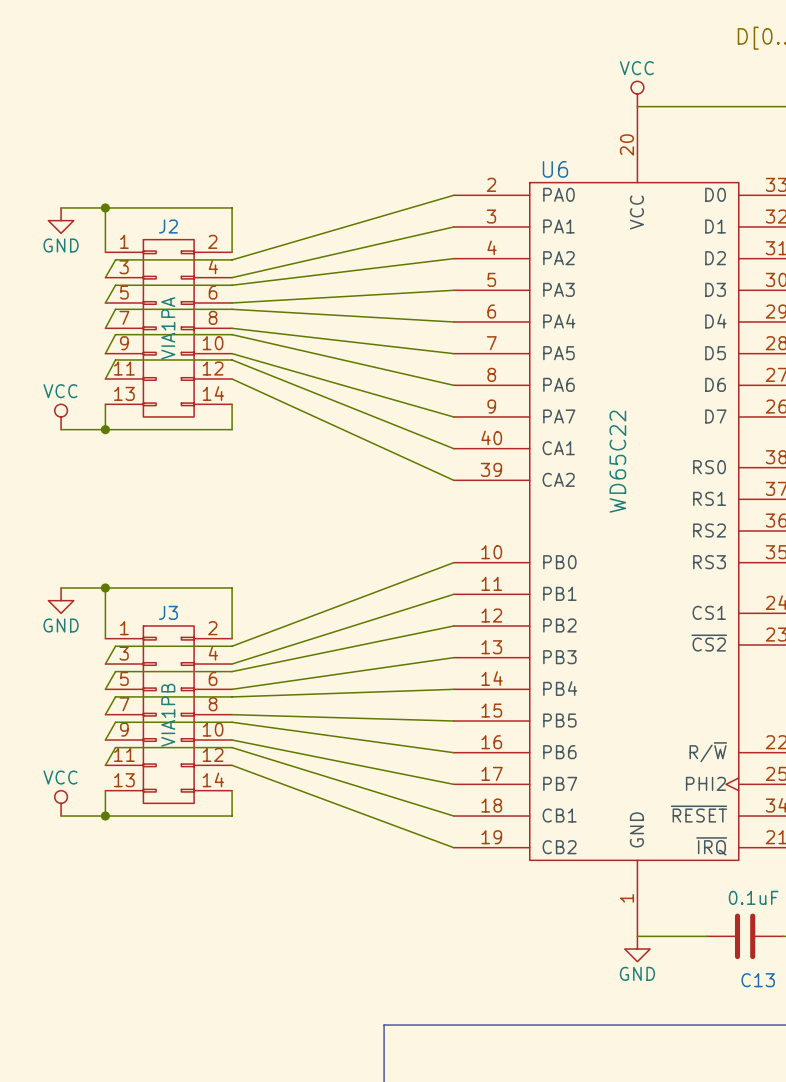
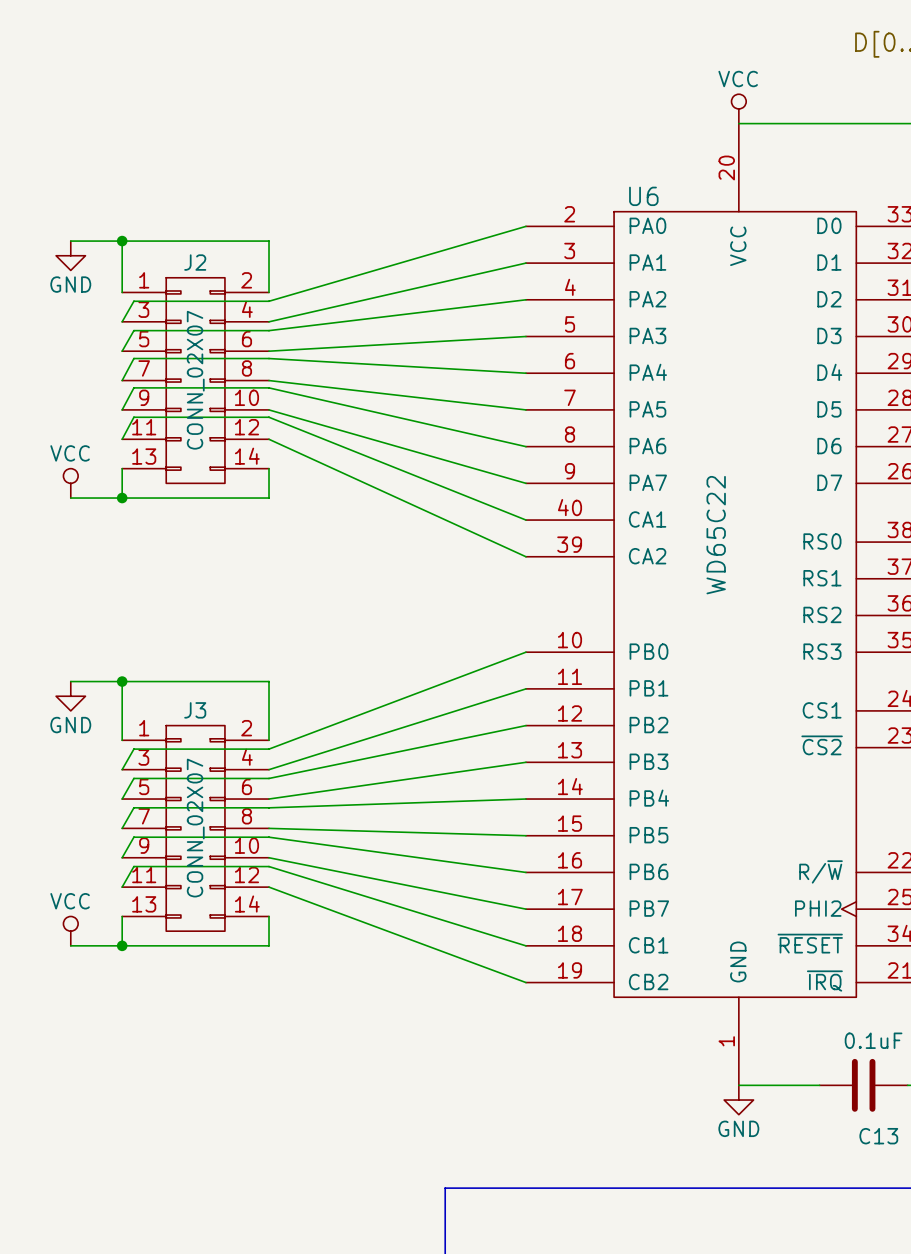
J2 value: VIA1PA (168, 328) -> CONN_02X07 (195, 380)
J3 value: VIA1PB (168, 715) -> CONN_02X07 (195, 828)

